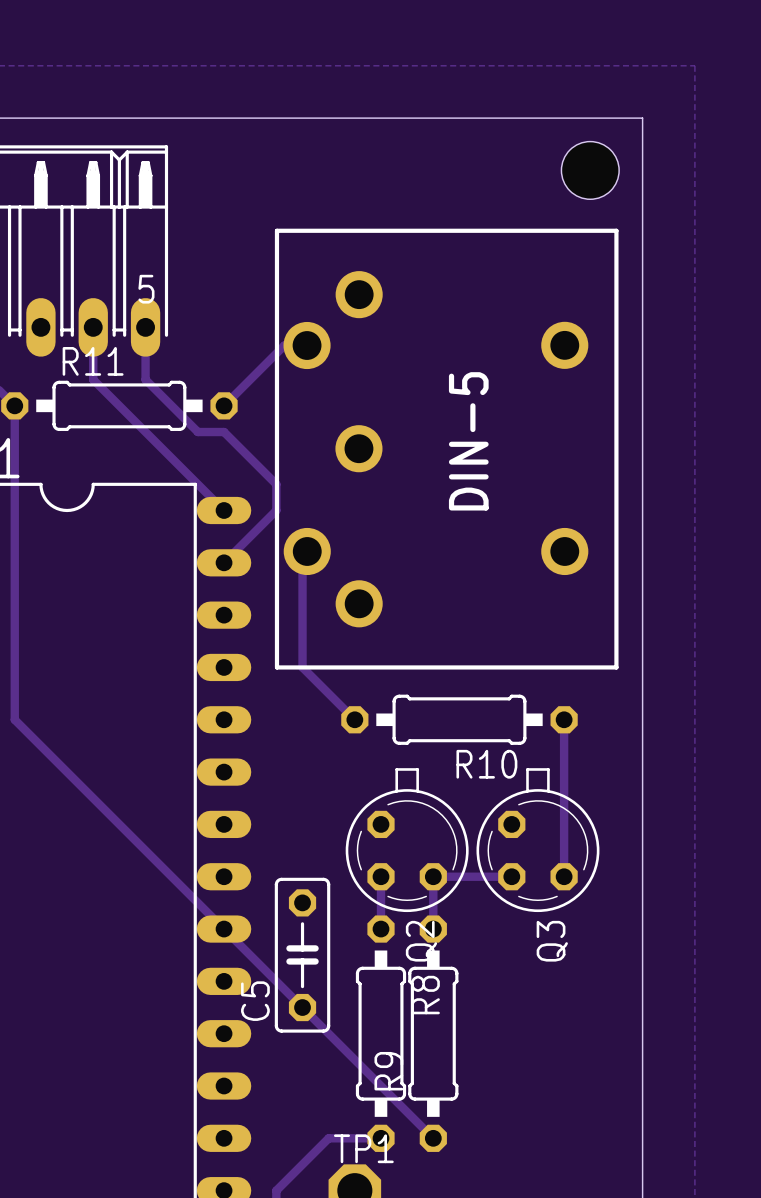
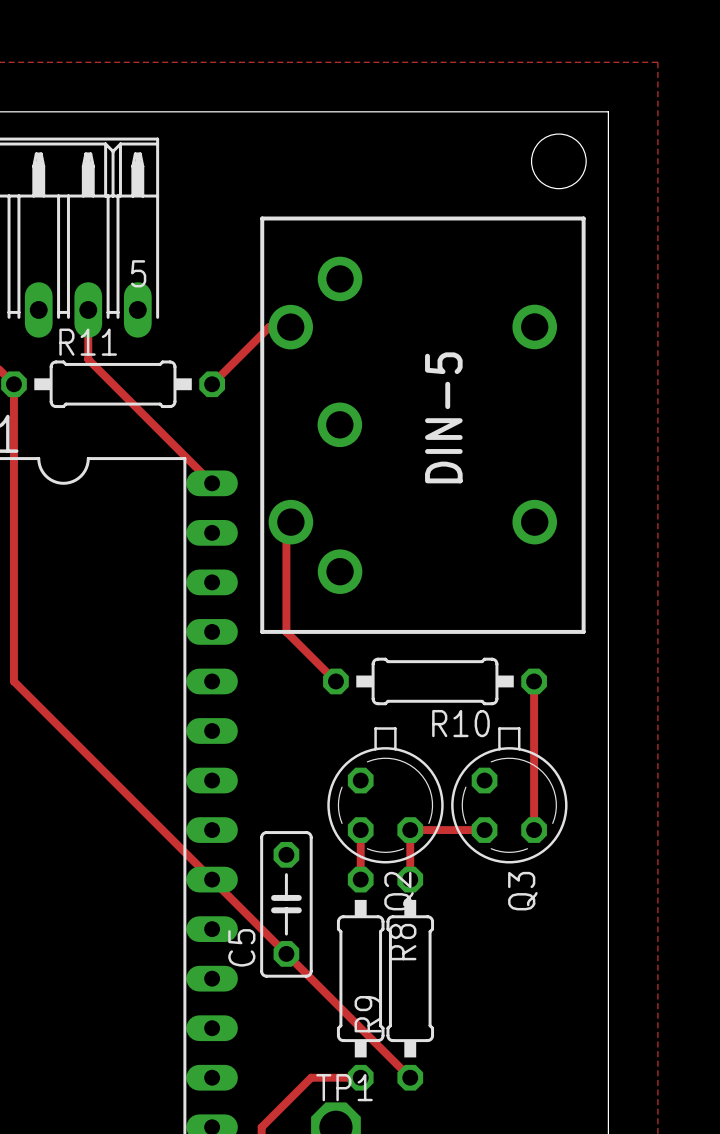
track: (145, 327) (145, 379) (197, 432) (224, 432) (276, 484) (276, 510) (224, 562) -> none

